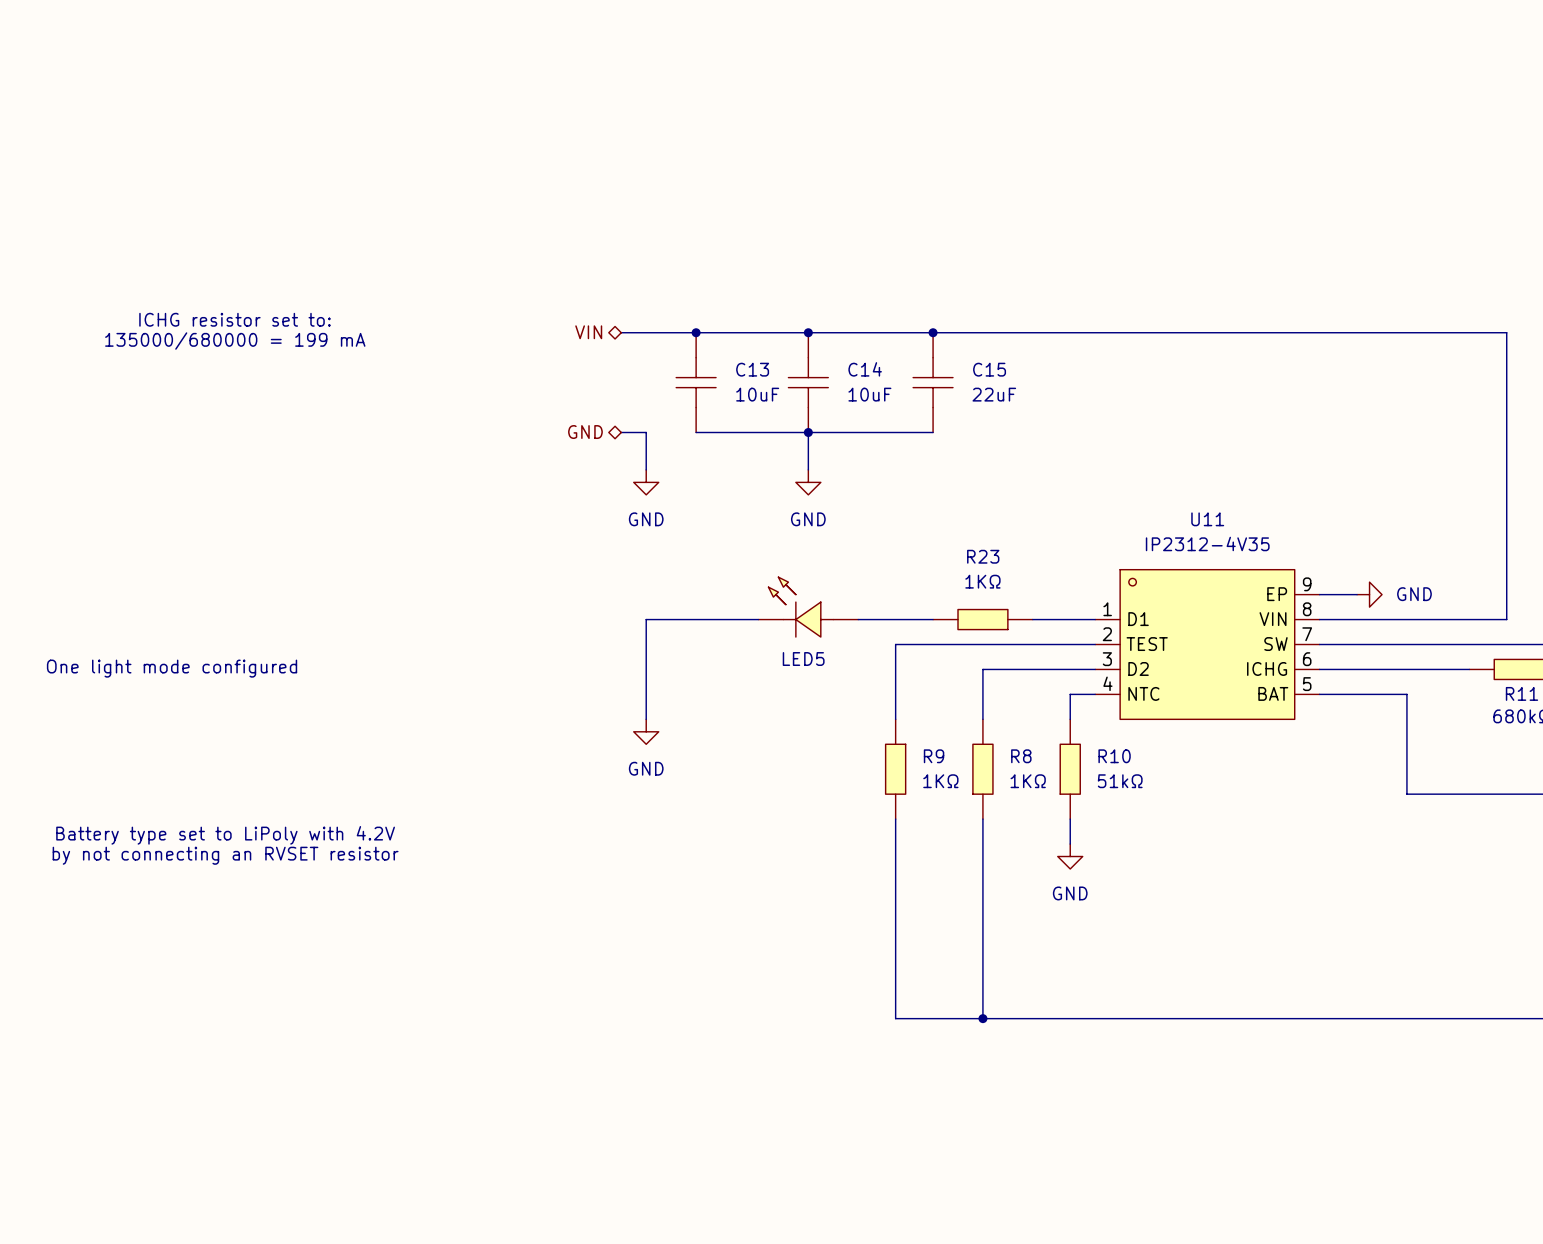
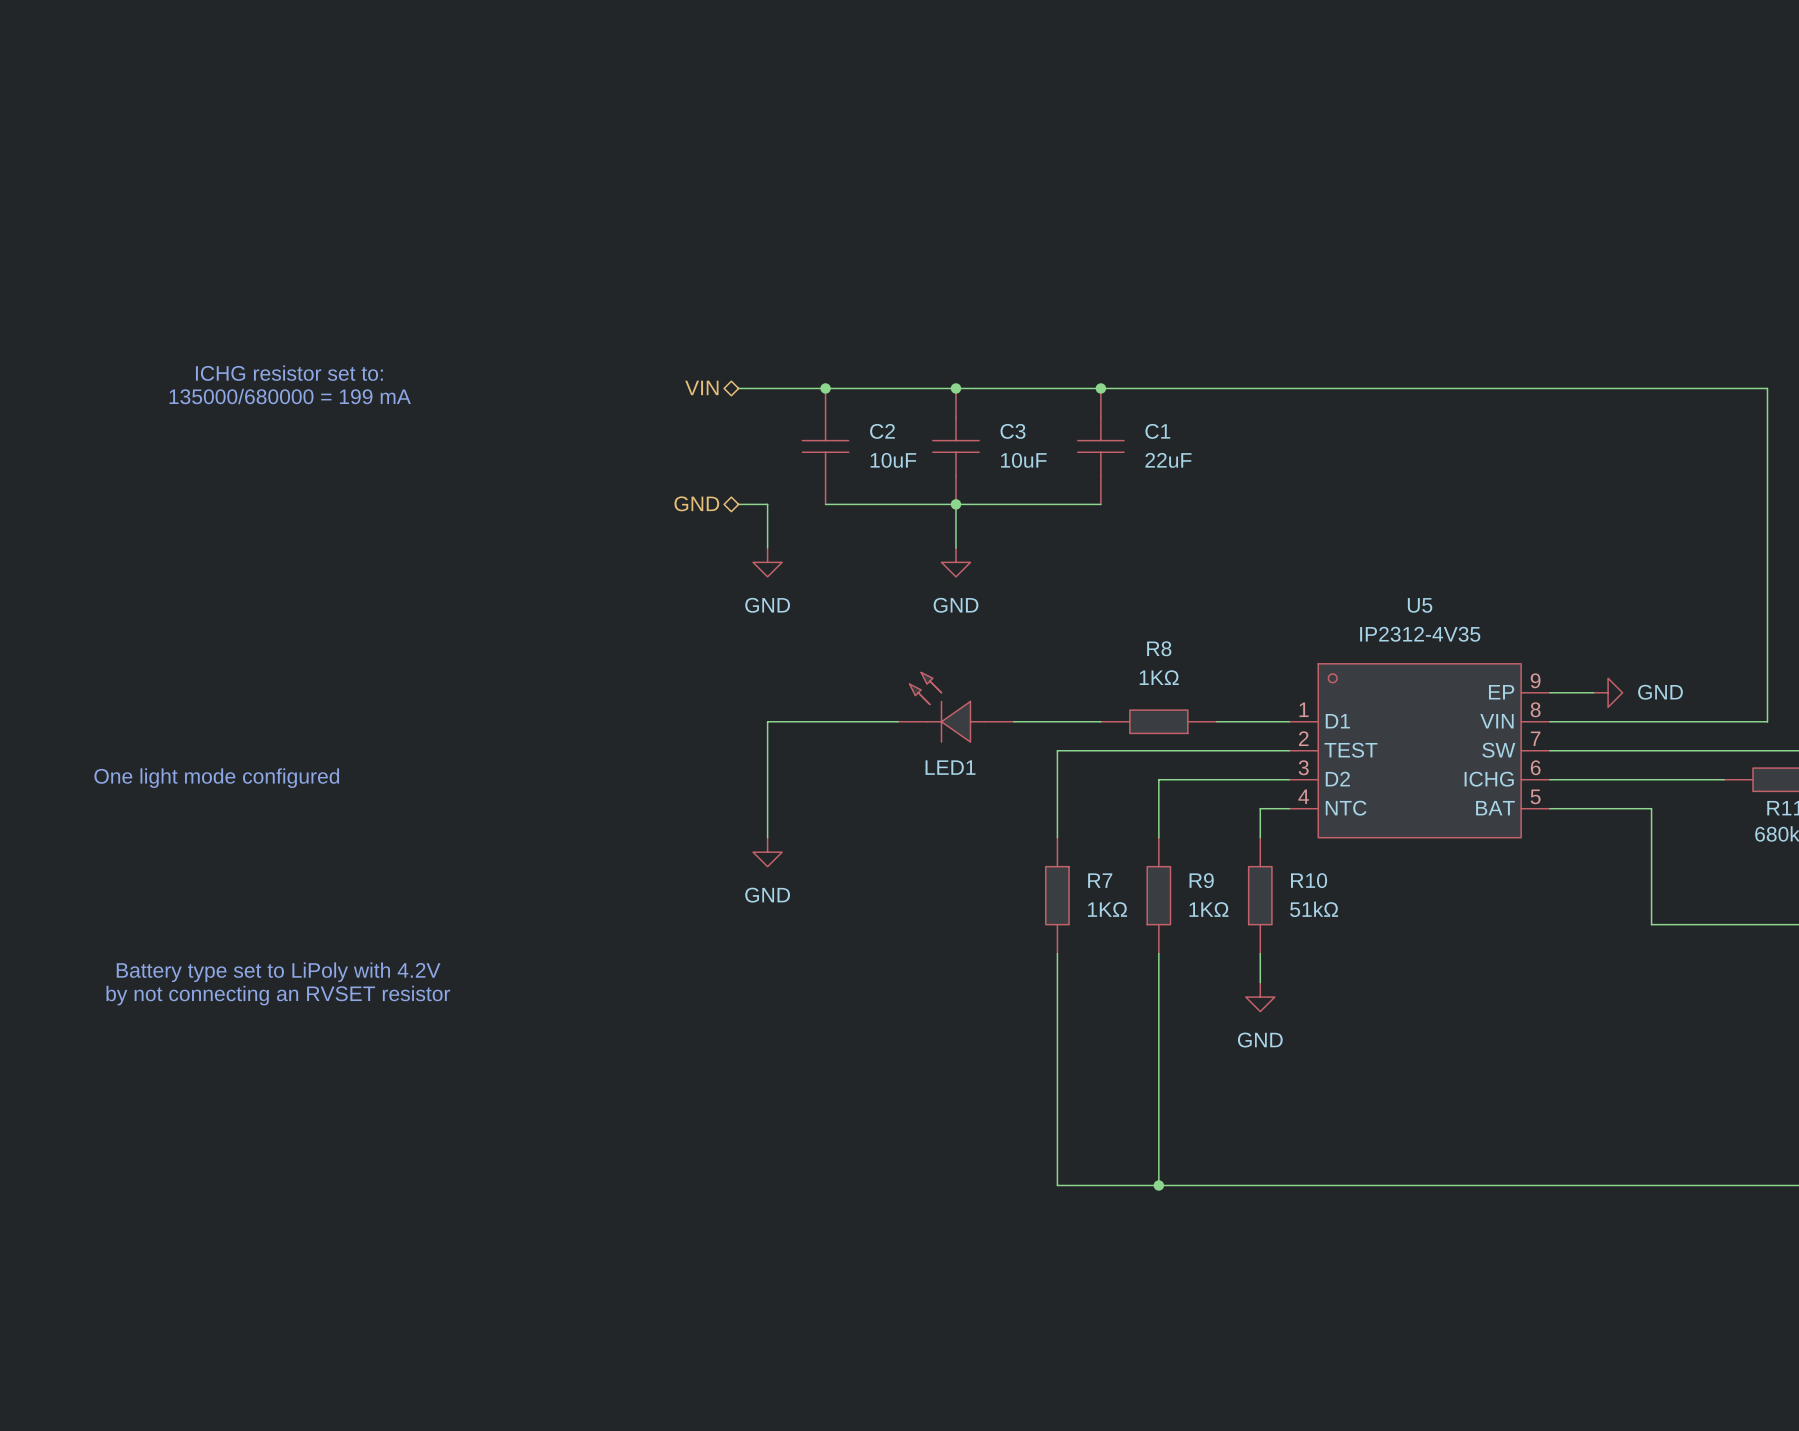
C13 name: C13 (752, 369) -> C2 (882, 431)
C14 name: C14 (865, 369) -> C3 (1012, 431)
C15 name: C15 (989, 369) -> C1 (1157, 431)
U11 name: U11 (1207, 519) -> U5 (1420, 605)
R23 name: R23 (983, 556) -> R8 (1159, 648)
LED5 name: LED5 (803, 659) -> LED1 (950, 767)
R9 name: R9 (934, 756) -> R7 (1100, 880)
R8 name: R8 (1021, 756) -> R9 (1201, 880)

